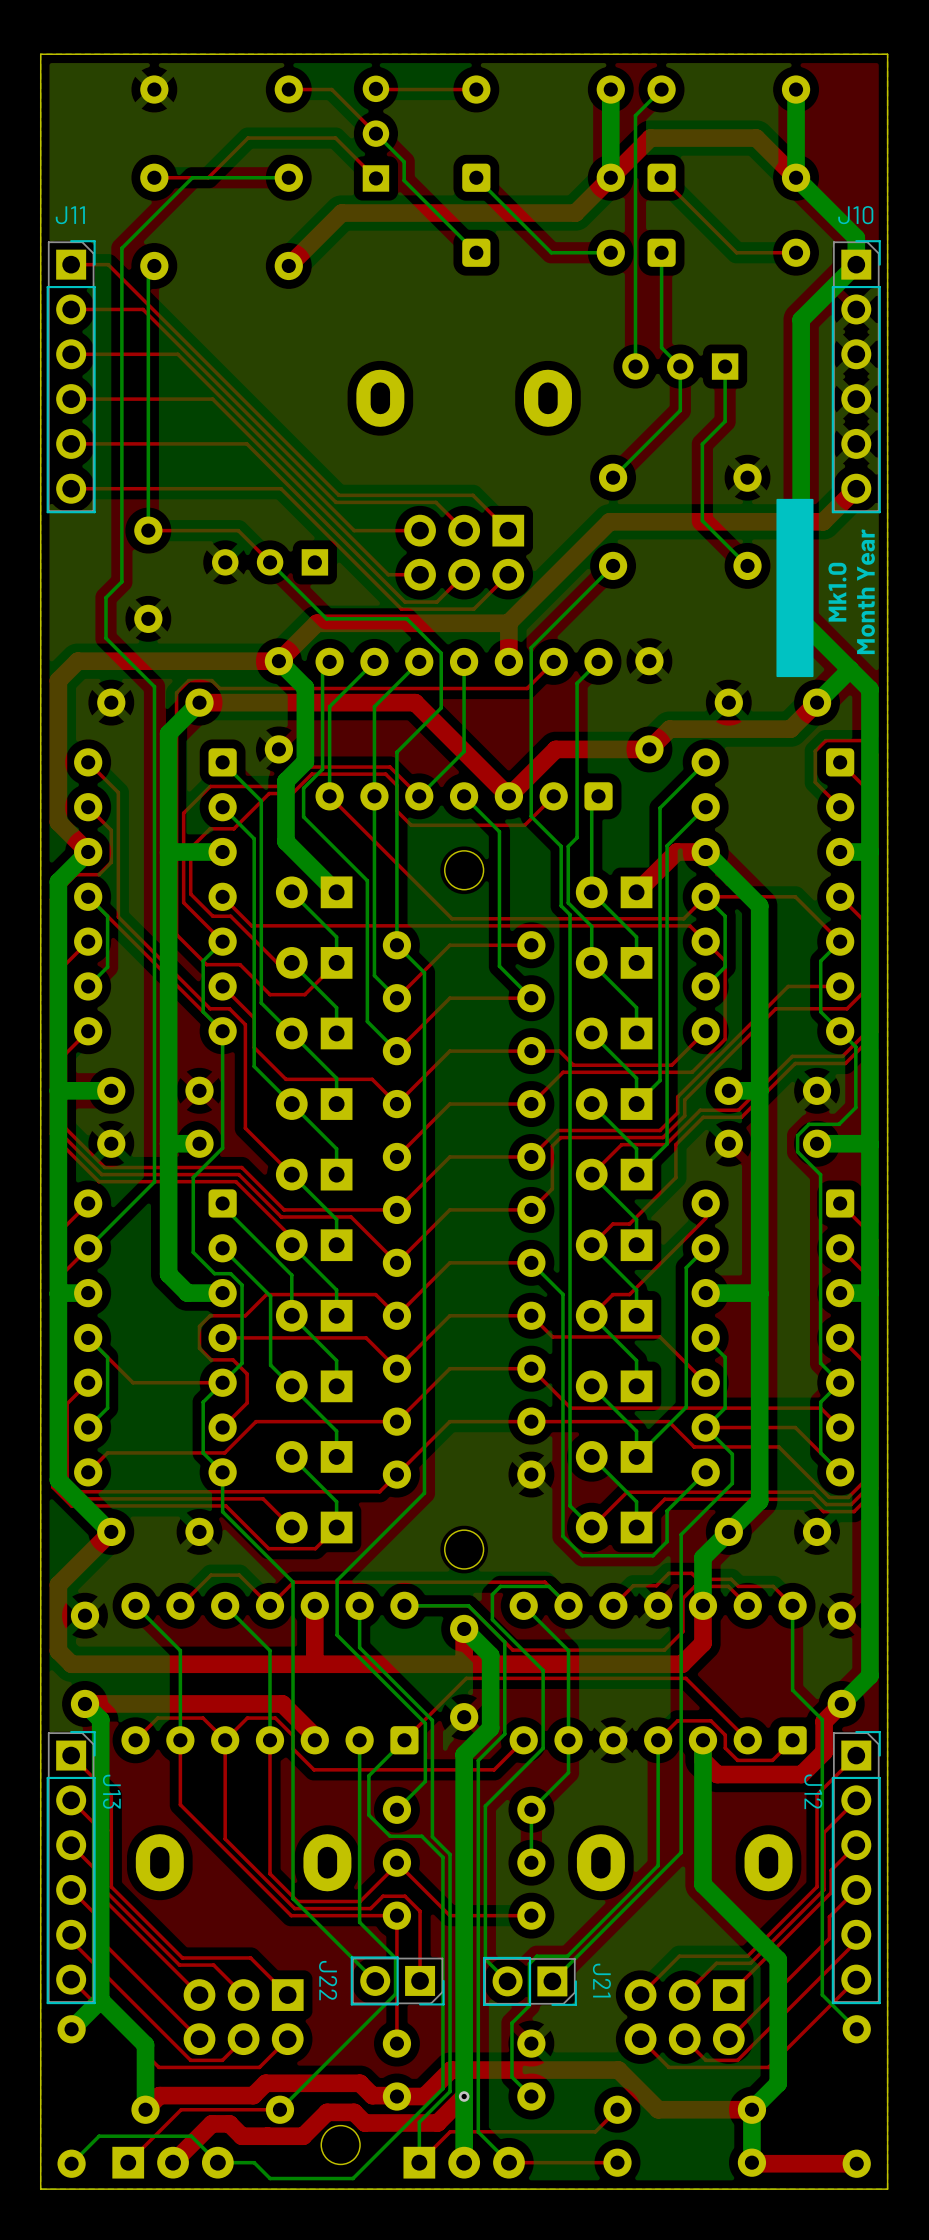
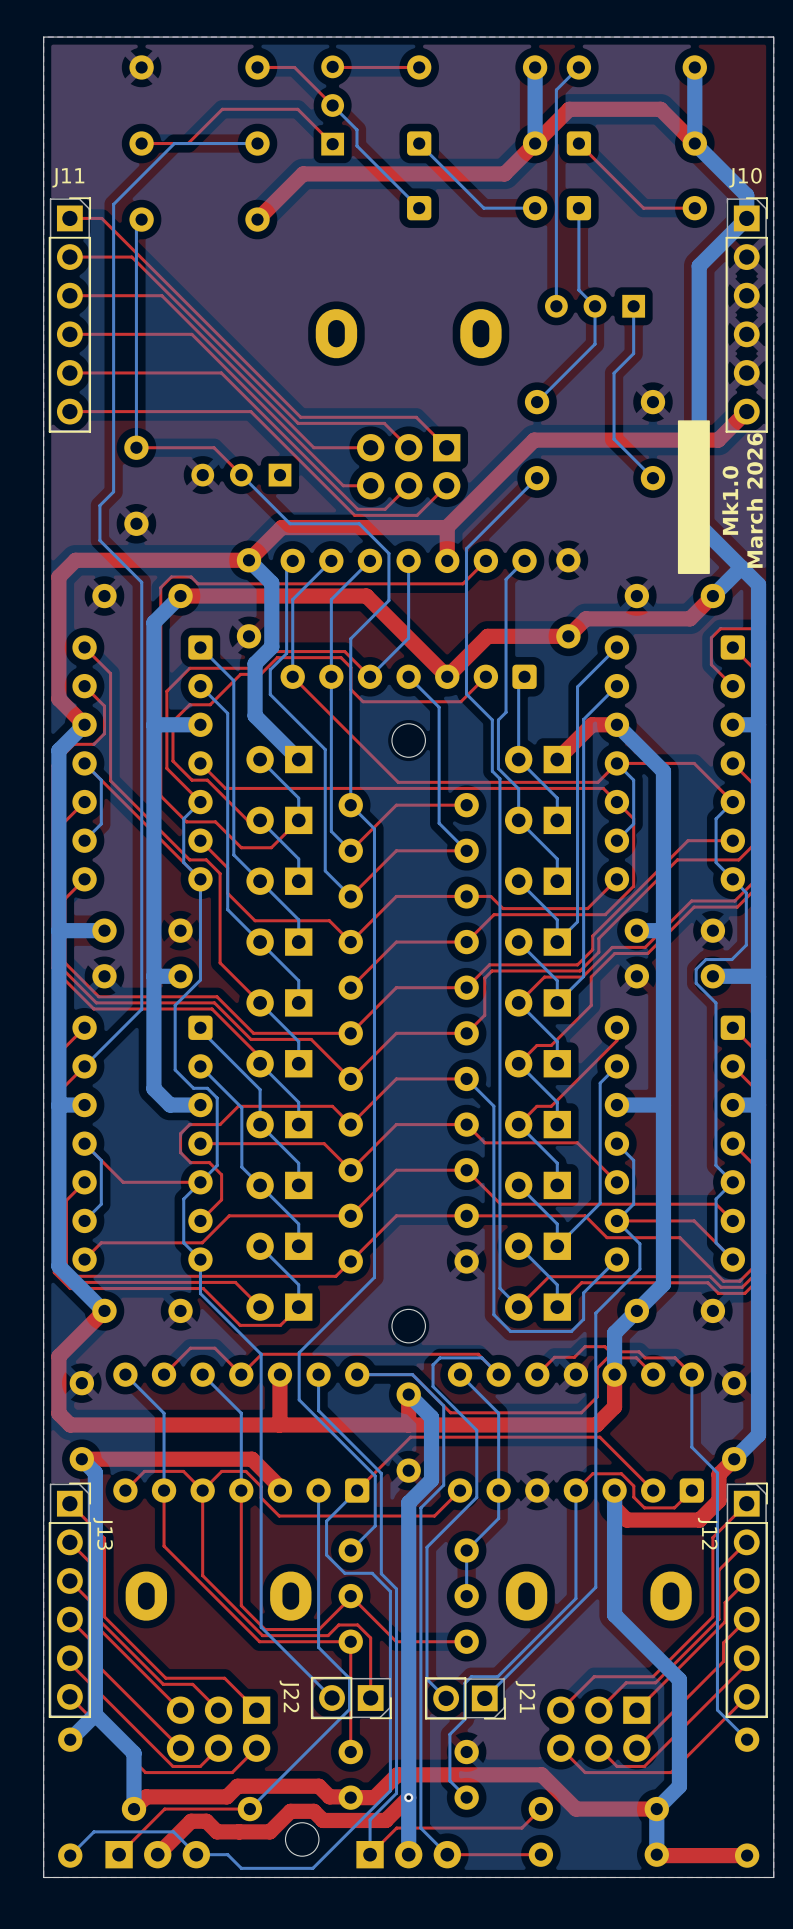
text: Month Year (865, 591) -> March 2026 (754, 500)

